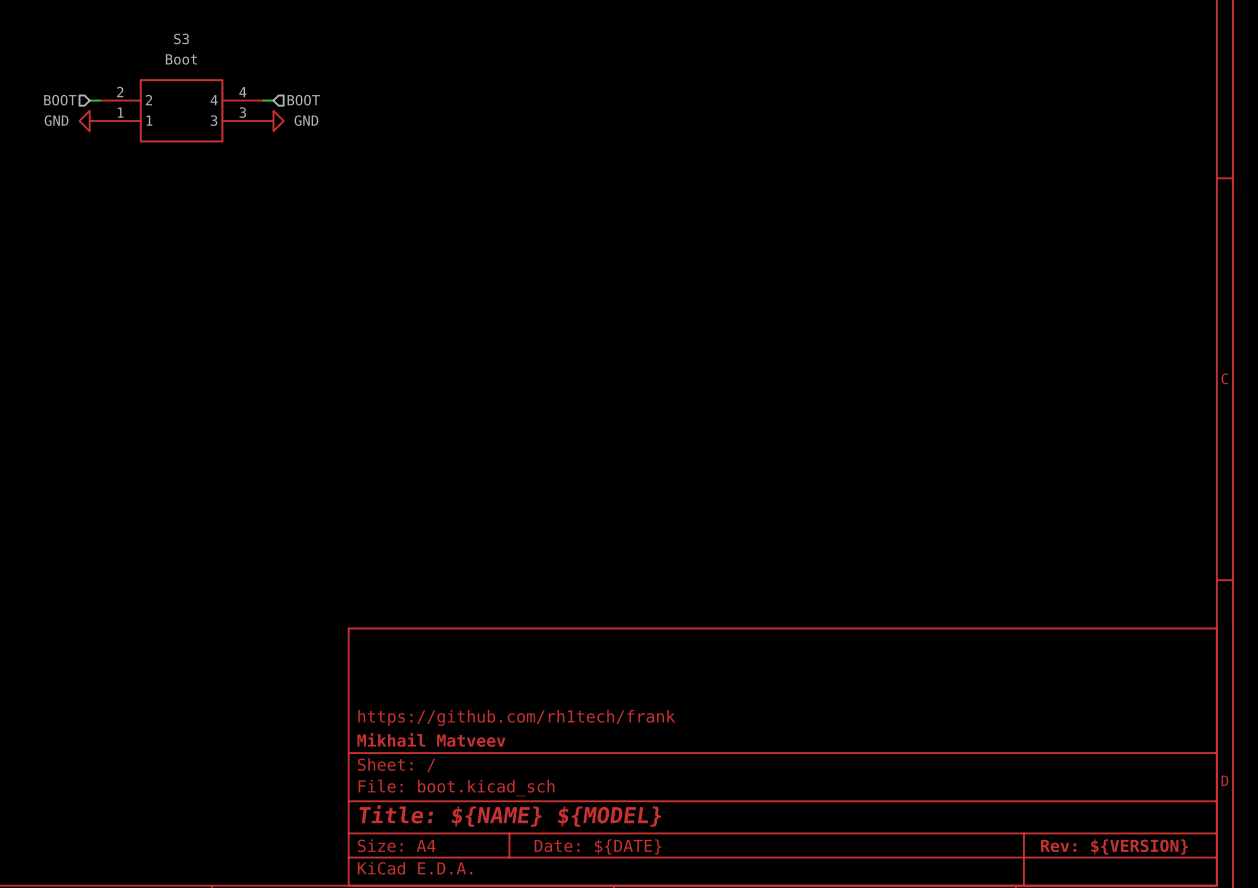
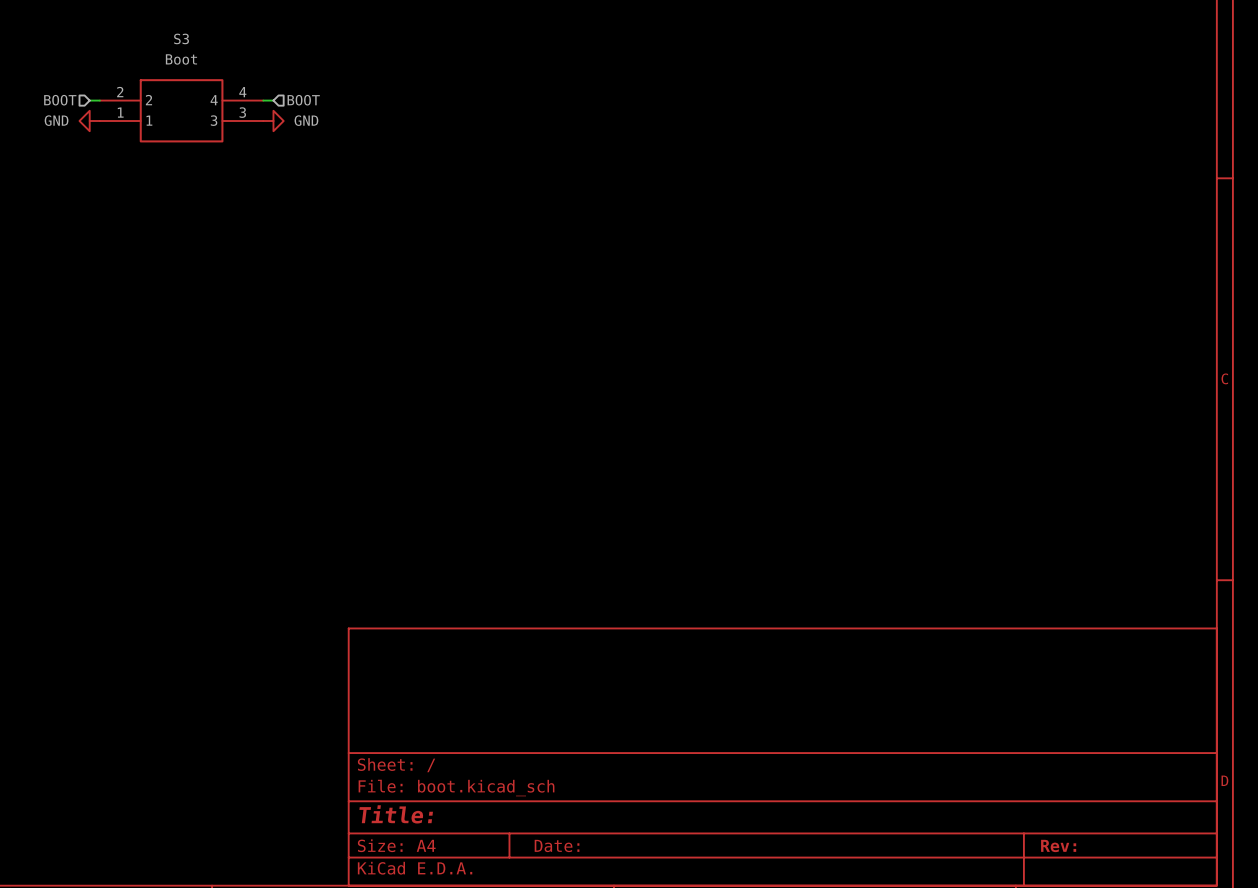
title block: https://github.com/rh1tech/frank (516, 717) -> none
title block: Mikhail Matveev (431, 739) -> none
title block: Title: ${NAME} ${MODEL} (510, 816) -> Title: (396, 814)
title block: Date: ${DATE} (597, 846) -> Date: (557, 845)
title block: Rev: ${VERSION} (1114, 846) -> Rev: (1058, 845)

